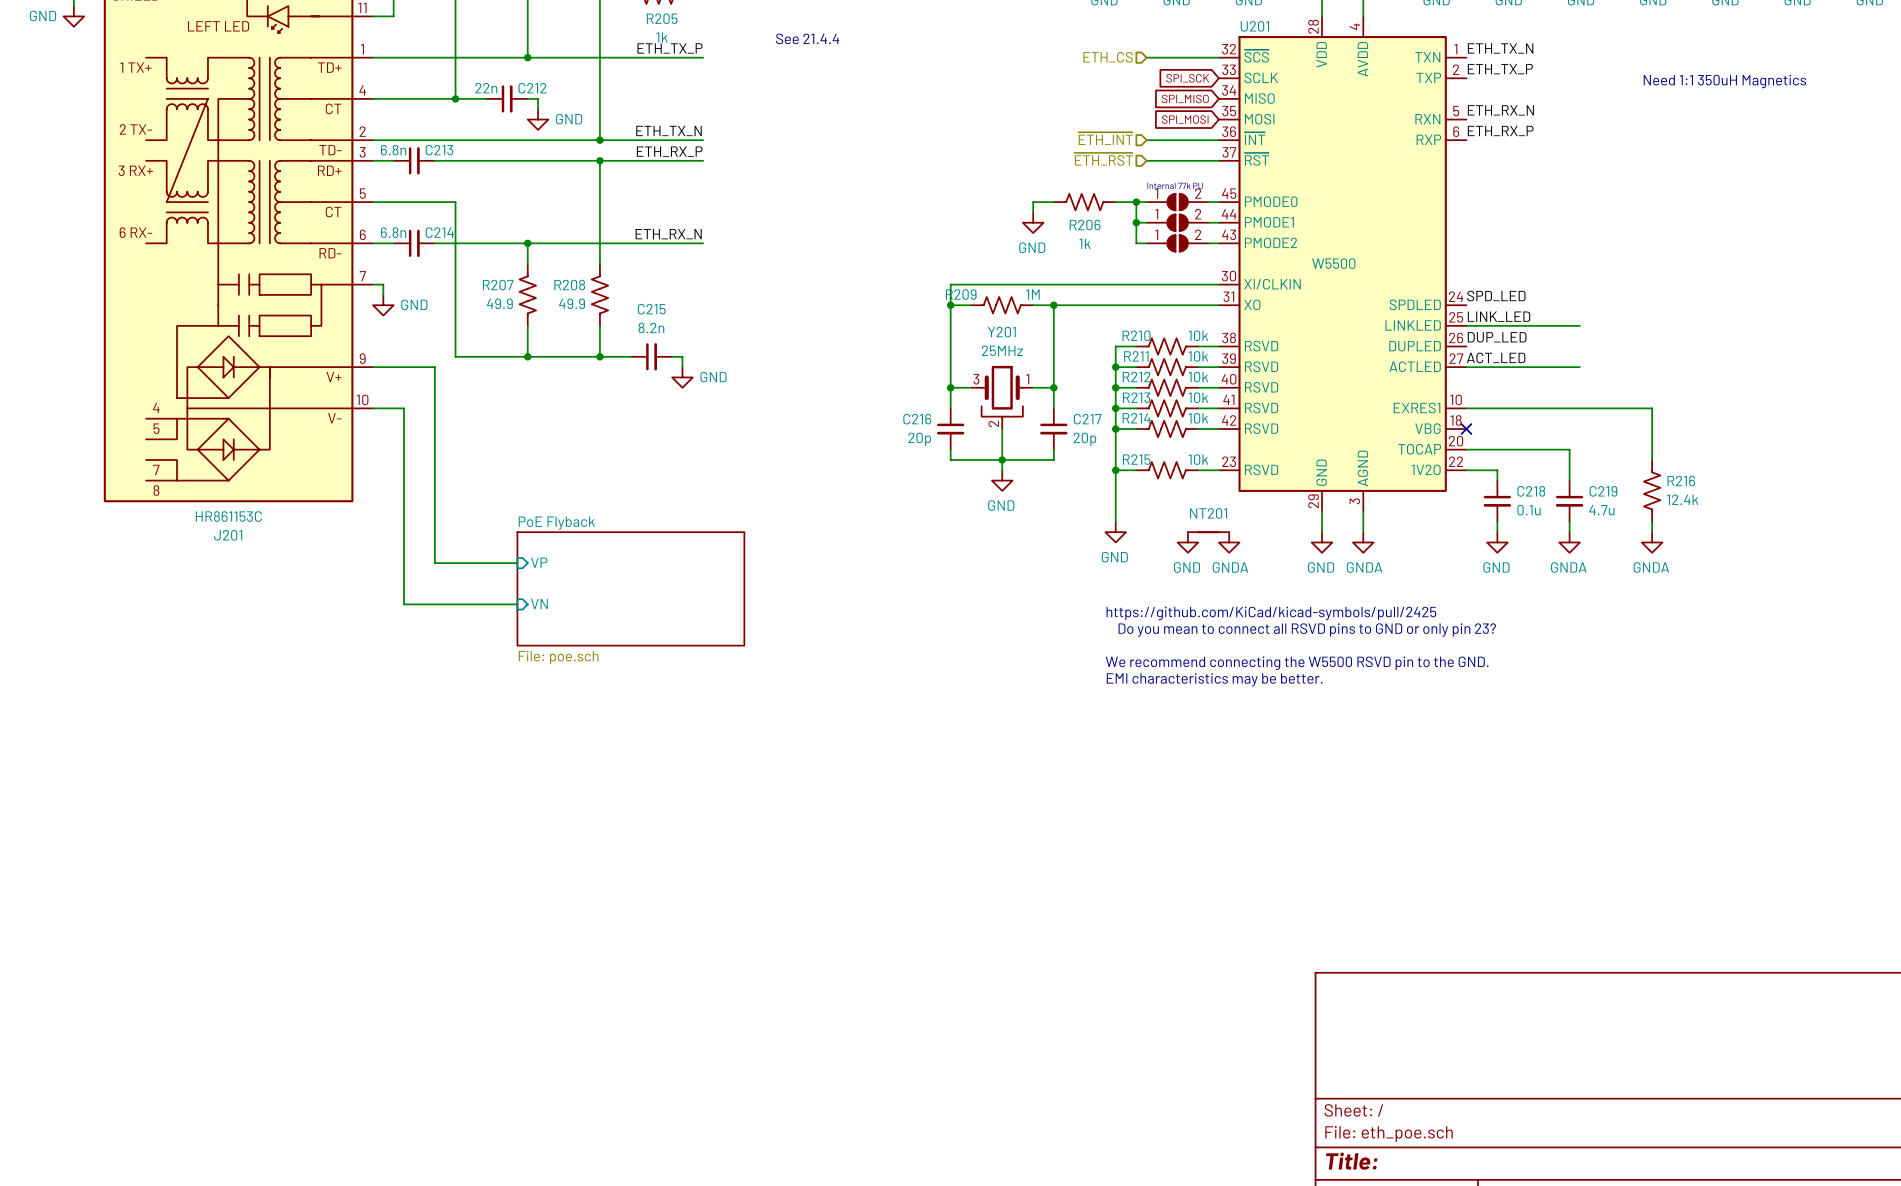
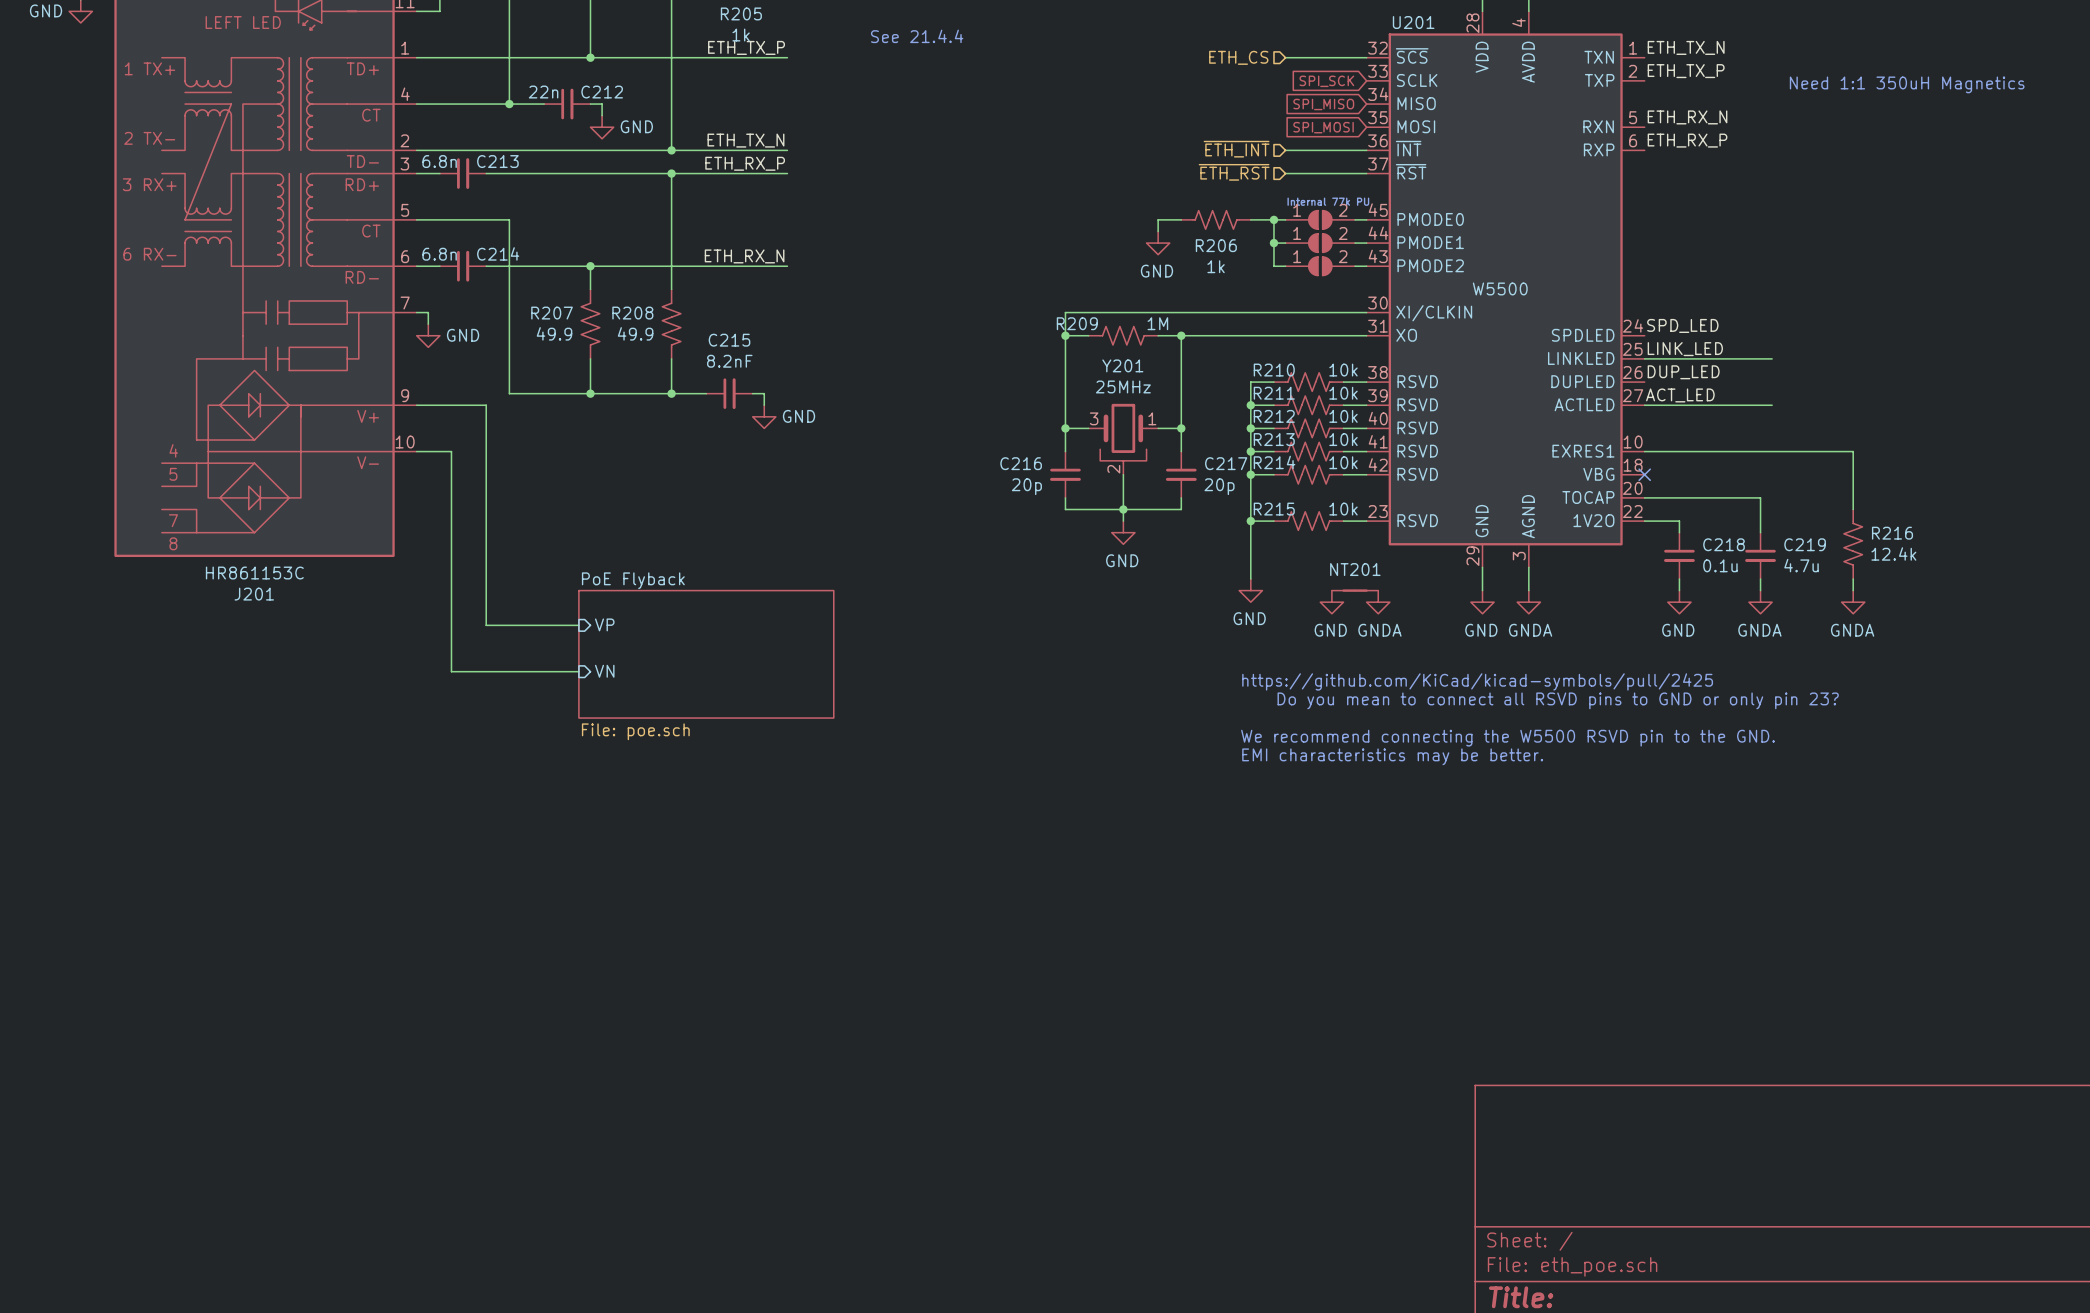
C215 value: 8.2n (651, 327) -> 8.2nF (729, 361)

